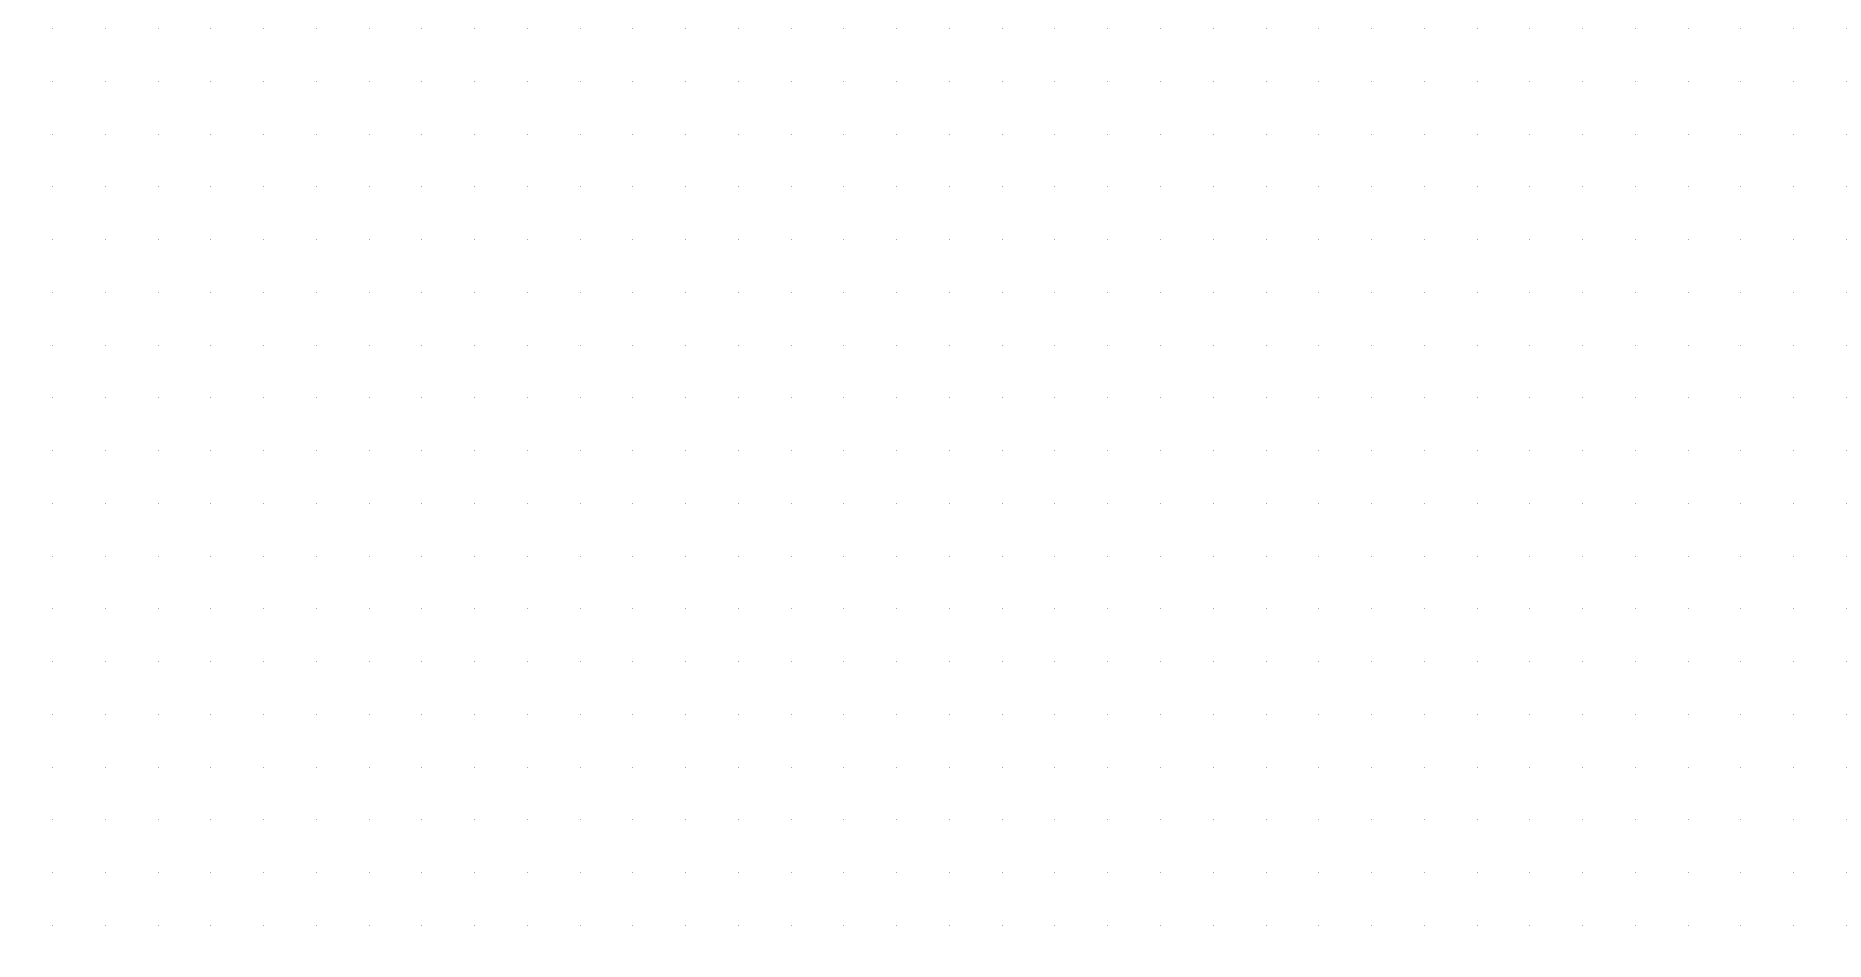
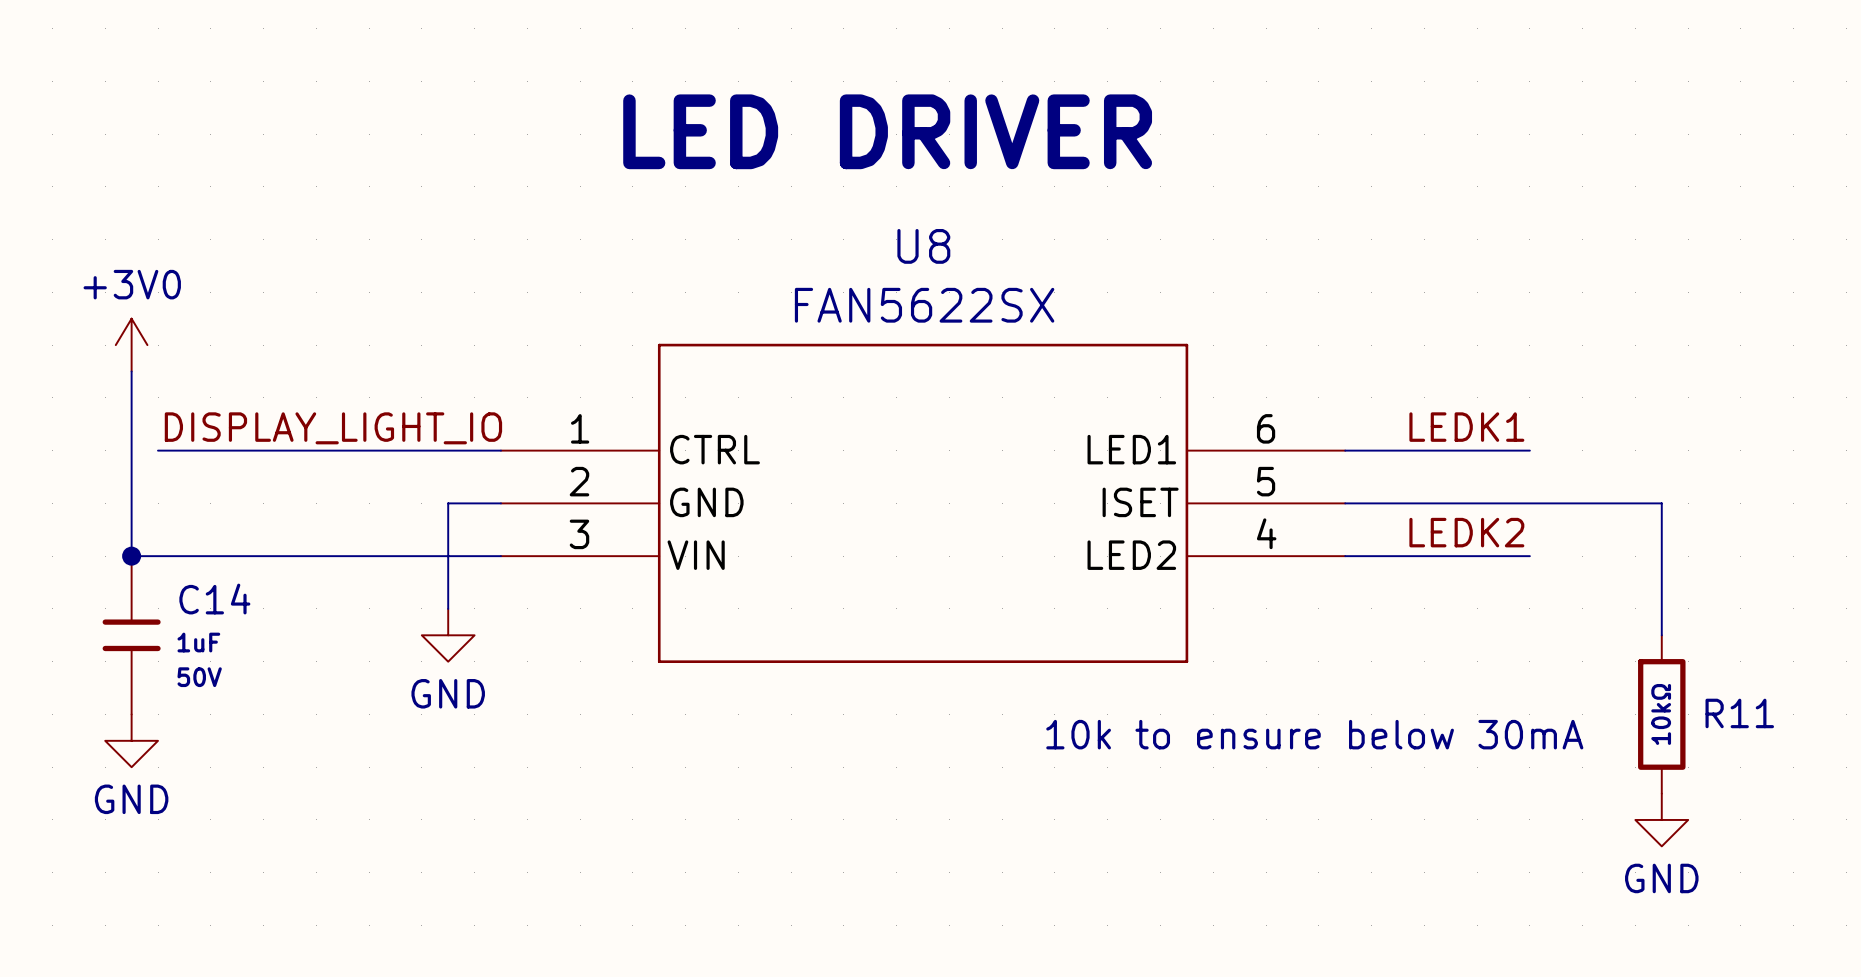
text: none -> LED DRIVER (887, 131)
power symbol: none -> +3V0 (131, 345)
wire: none -> (131, 371) (131, 556) (500, 556)
label: none -> LEDK1 (1466, 427)
label: none -> DISPLAY_LIGHT_IO (333, 428)
wire: none -> (158, 450) (500, 450)
wire: none -> (1345, 450) (1529, 450)
wire: none -> (500, 503) (448, 503) (448, 608)
U8: none -> FAN5622SX (923, 503)
wire: none -> (1345, 503) (1661, 503) (1661, 635)
label: none -> LEDK2 (1466, 532)
junction: none -> (131, 556)
wire: none -> (1345, 556) (1529, 556)
C14: none -> 1uF (131, 635)
power symbol: none -> GND (448, 635)
R11: none -> 10kΩ (1661, 714)
text: none -> 10k to ensure below 30mA (1314, 734)
power symbol: none -> GND (131, 740)
power symbol: none -> GND (1661, 819)

